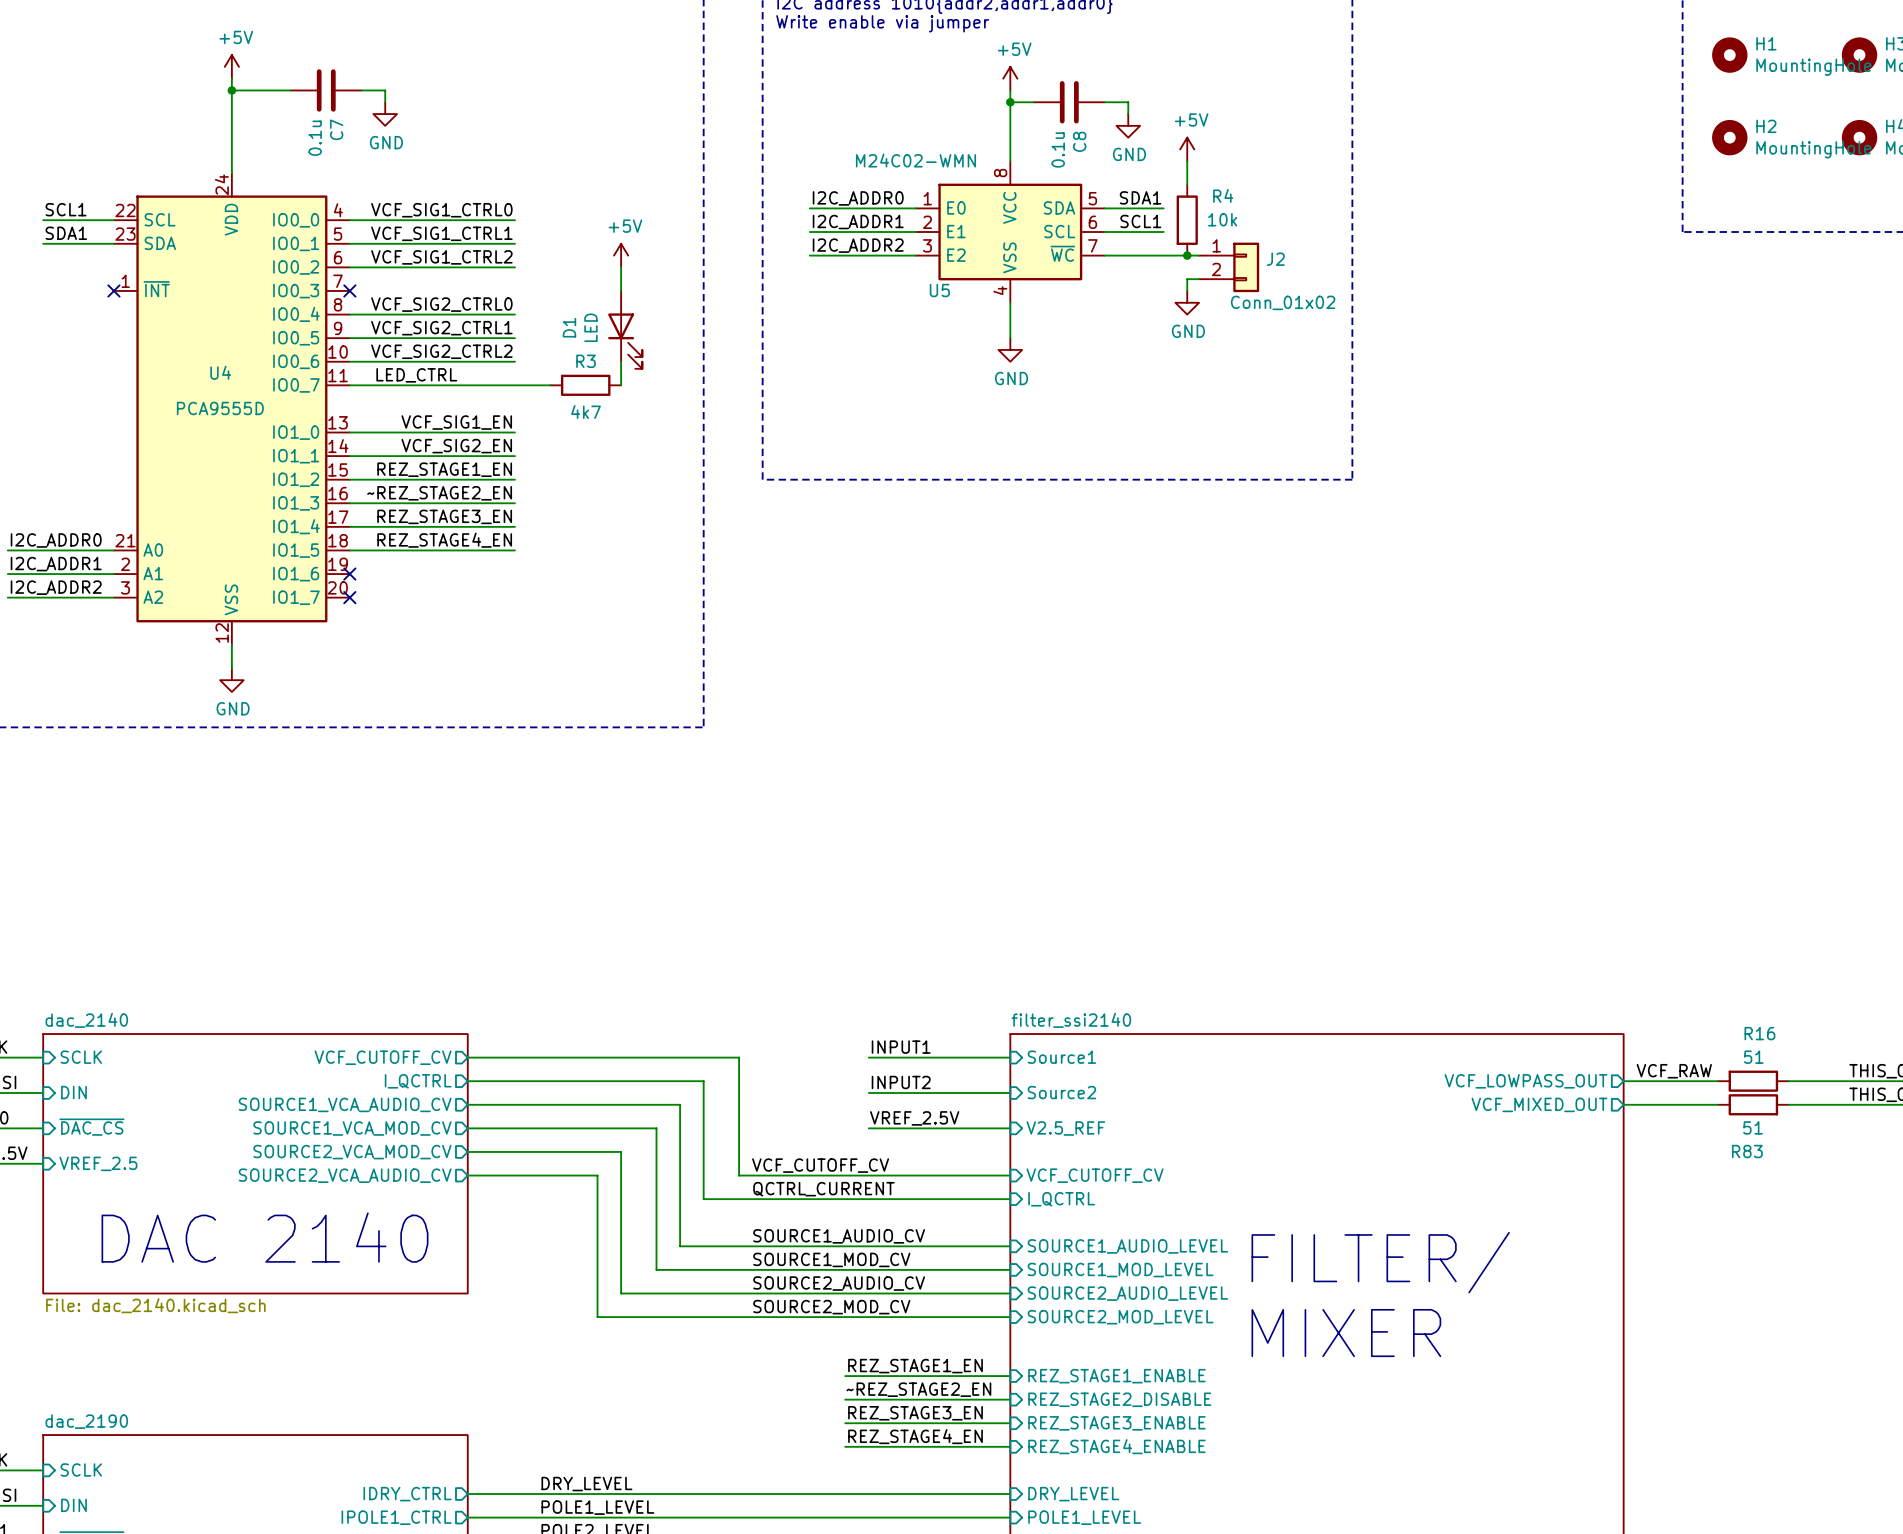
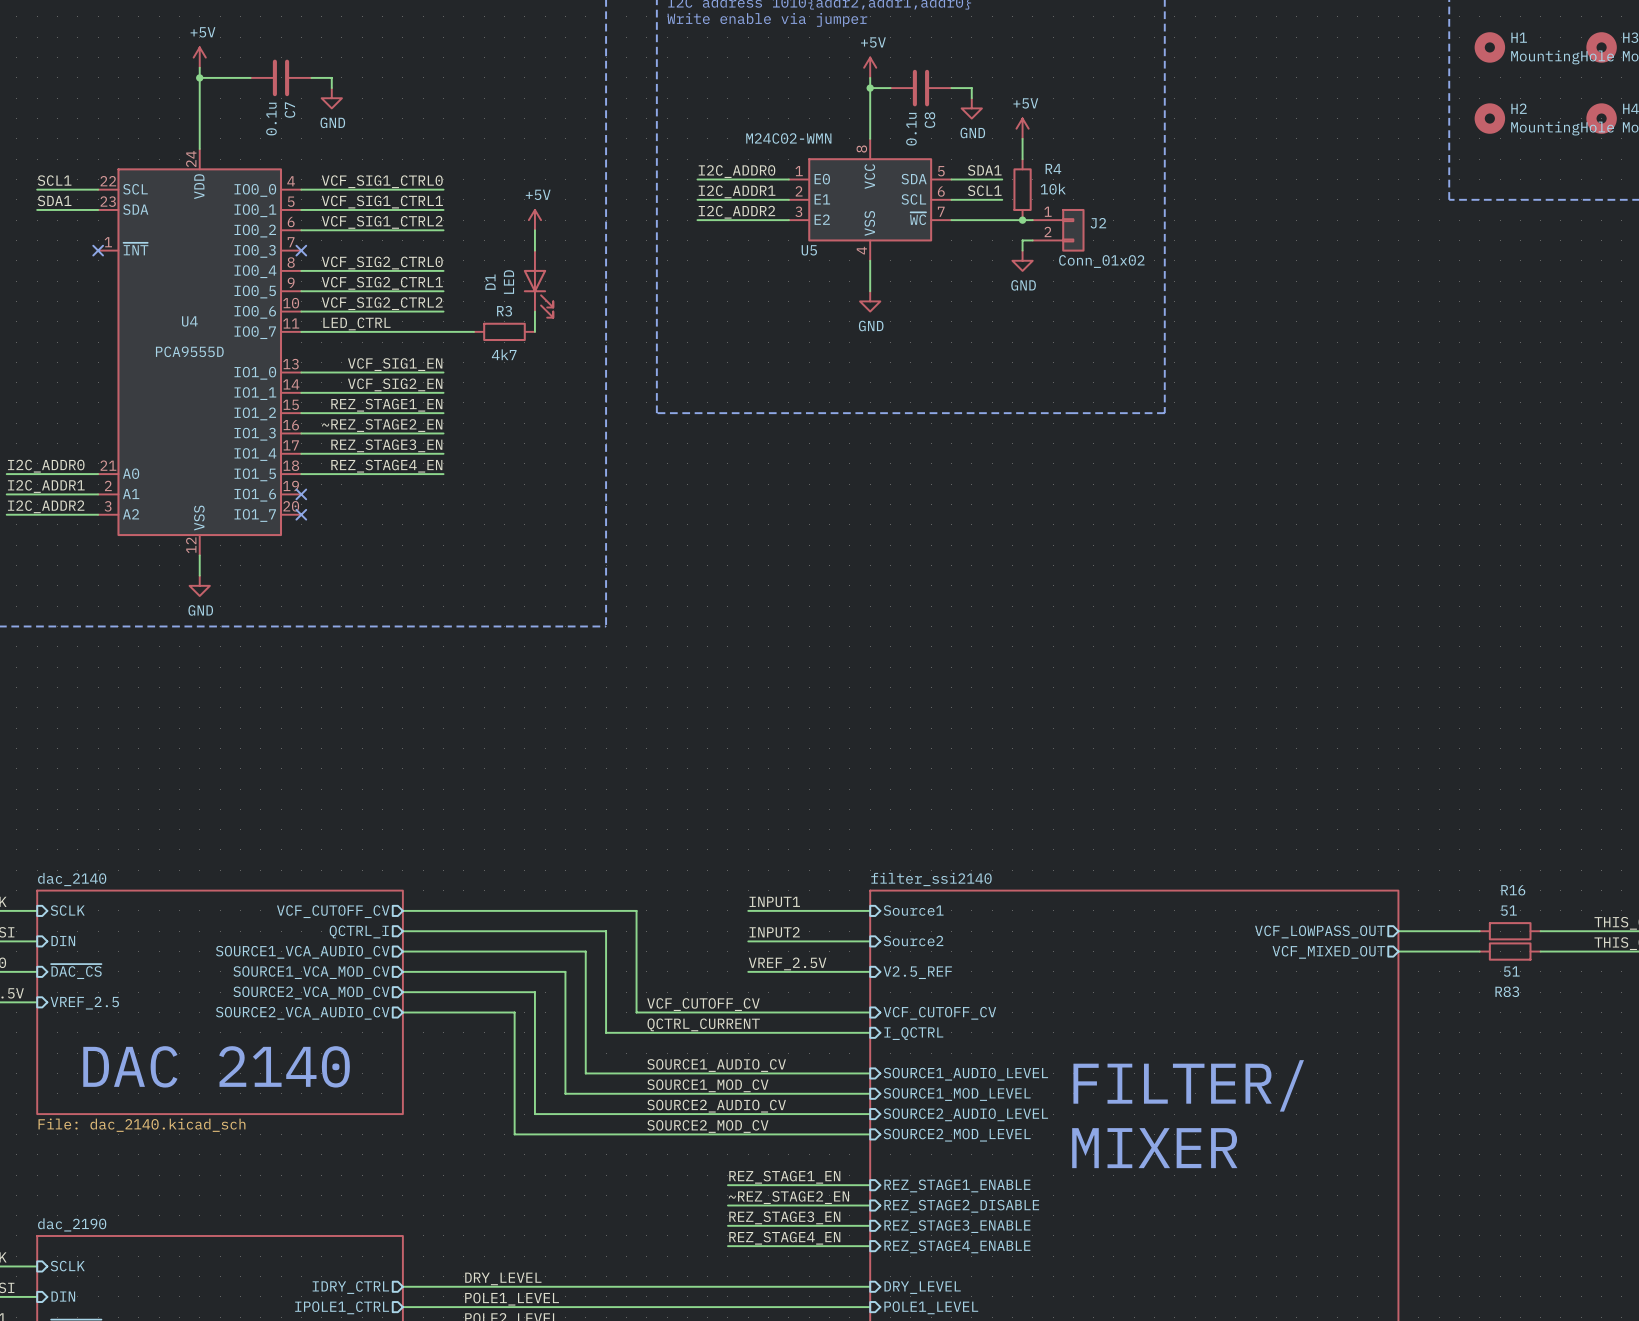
label: VCF_RAW (1674, 1071) -> none
sheet pin: I_QCTRL (418, 1081) -> QCTRL_I (359, 931)

